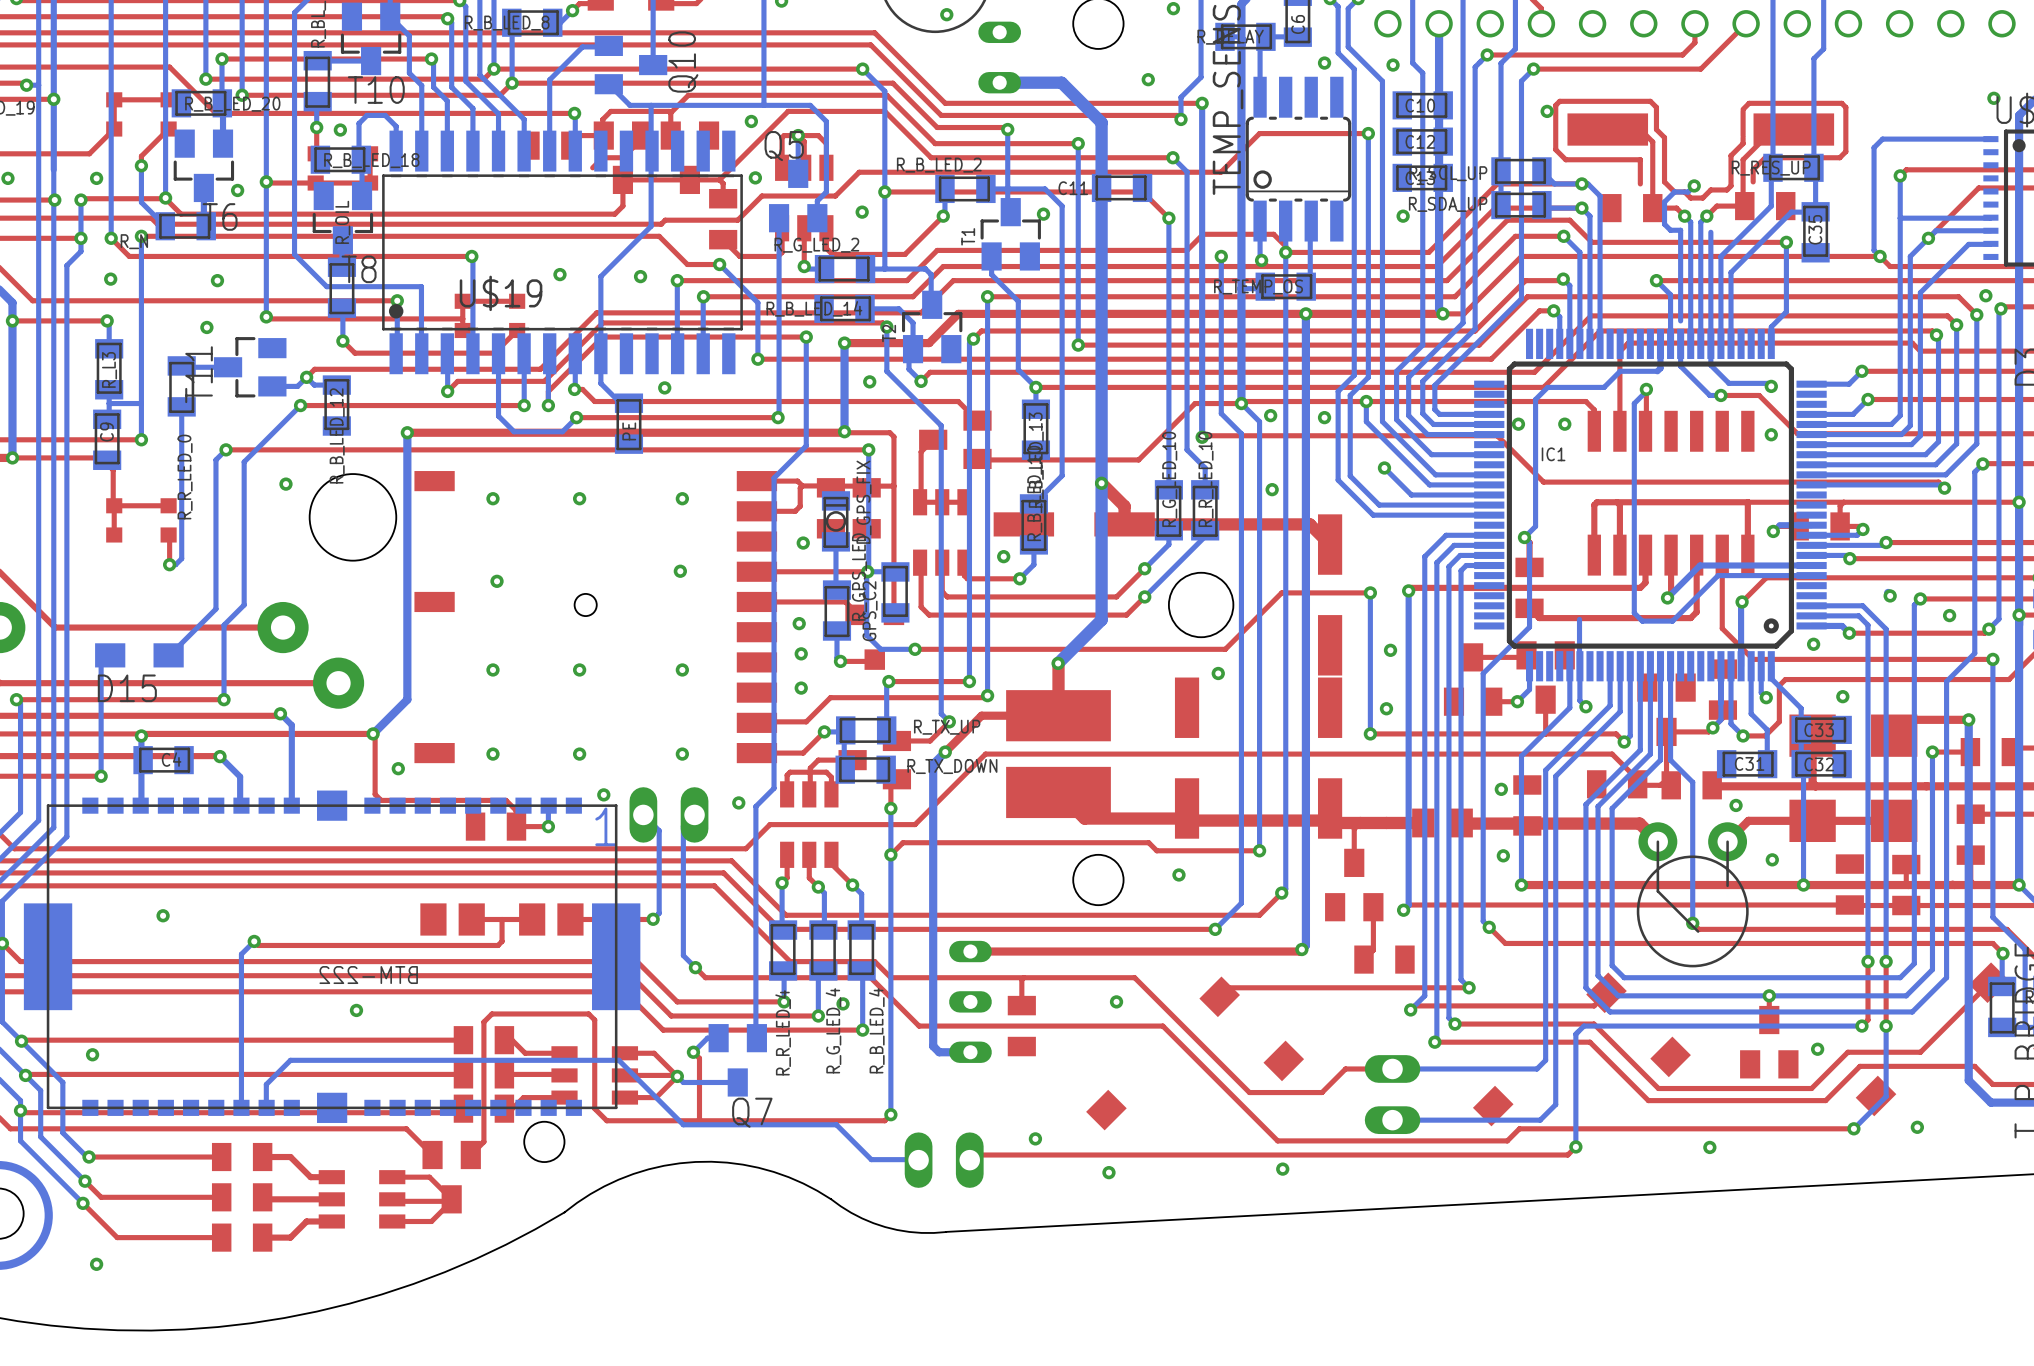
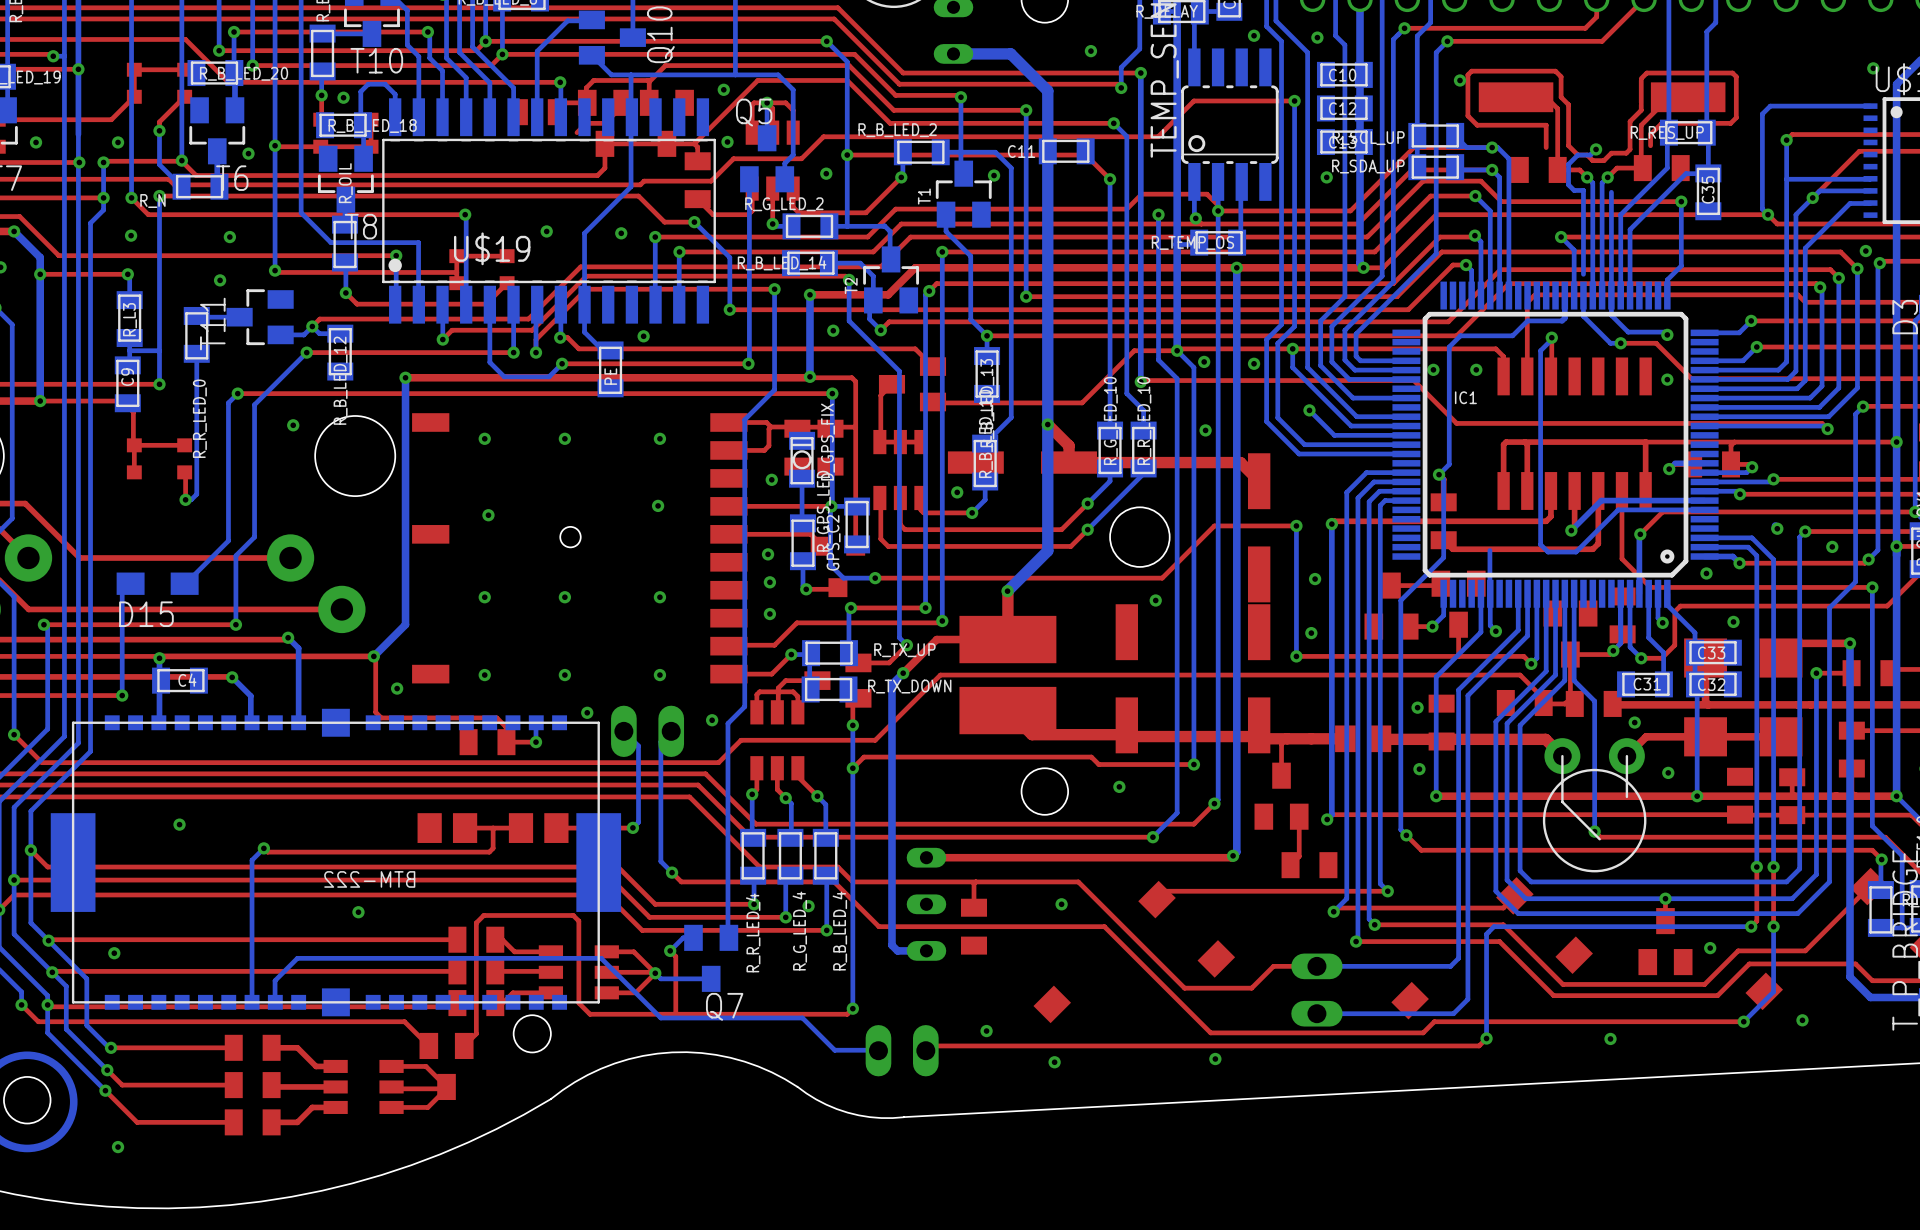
text: 1 (605, 826) -> none

